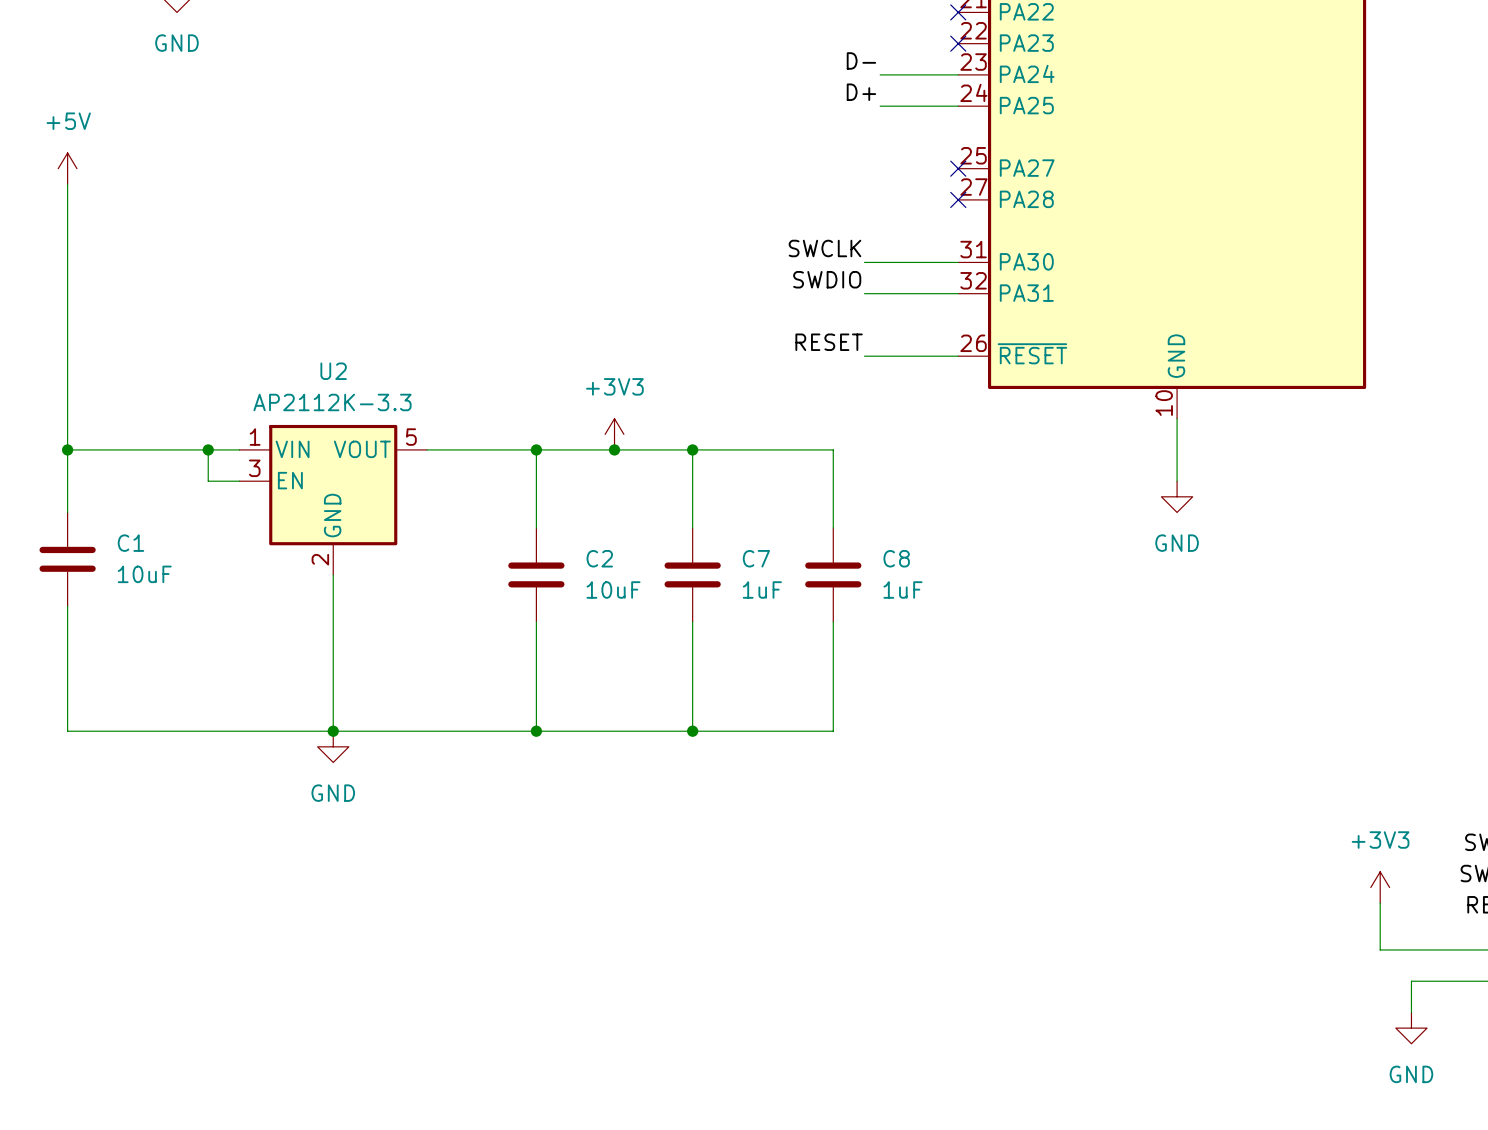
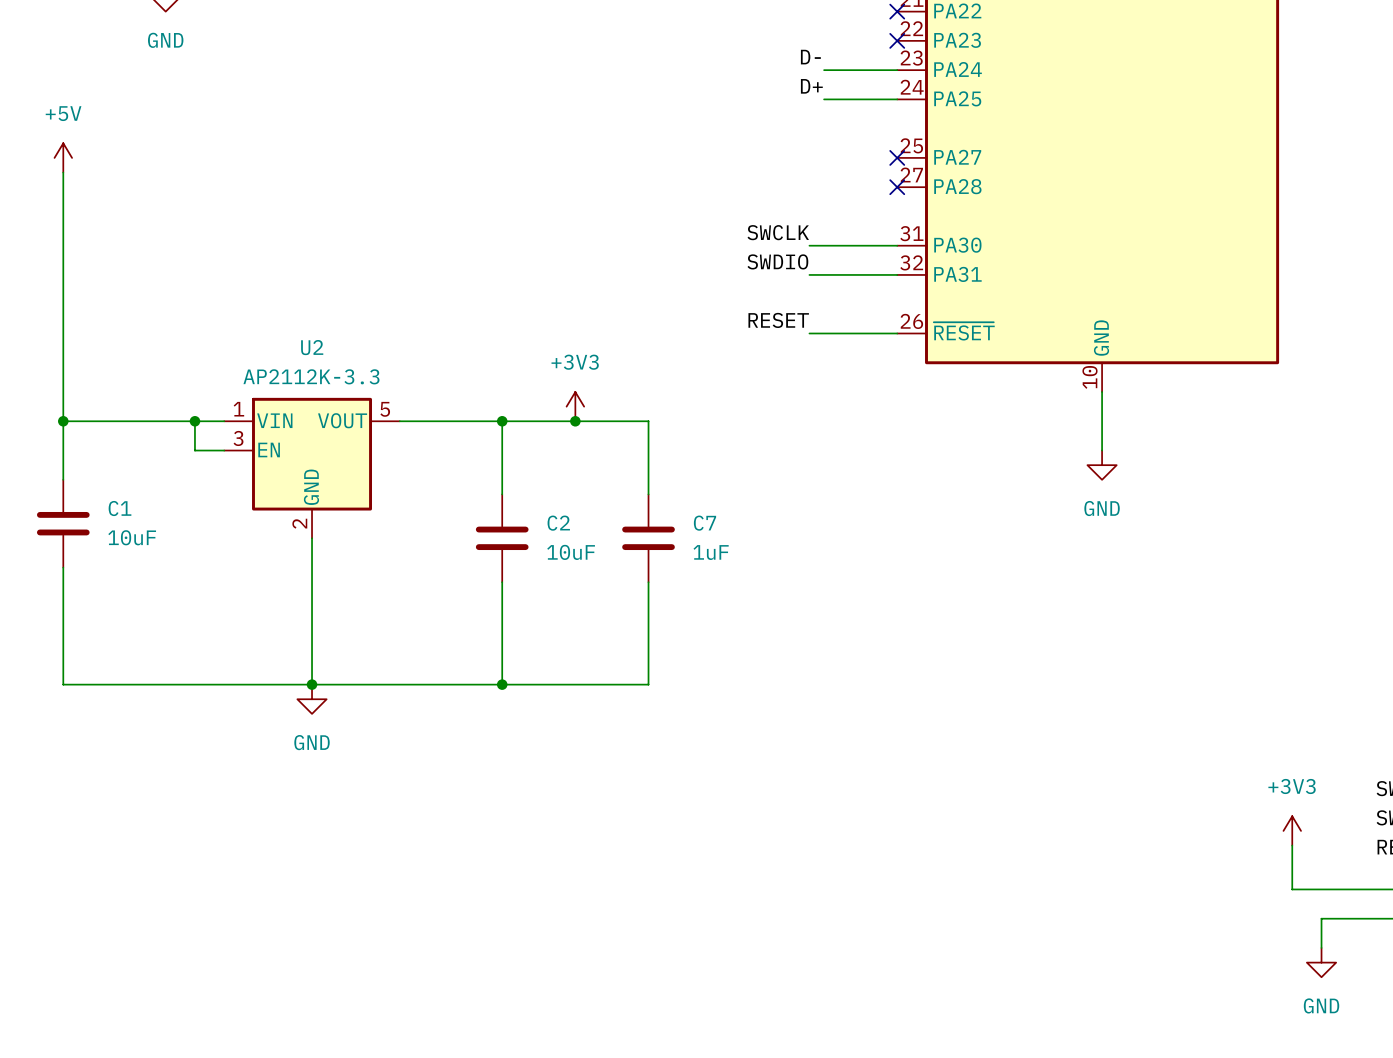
wire: (692, 449) (833, 449) (833, 528) -> none
junction: (692, 449) -> none
C8: 1uF (833, 574) -> none
wire: (833, 621) (833, 731) (692, 731) -> none
junction: (692, 731) -> none

